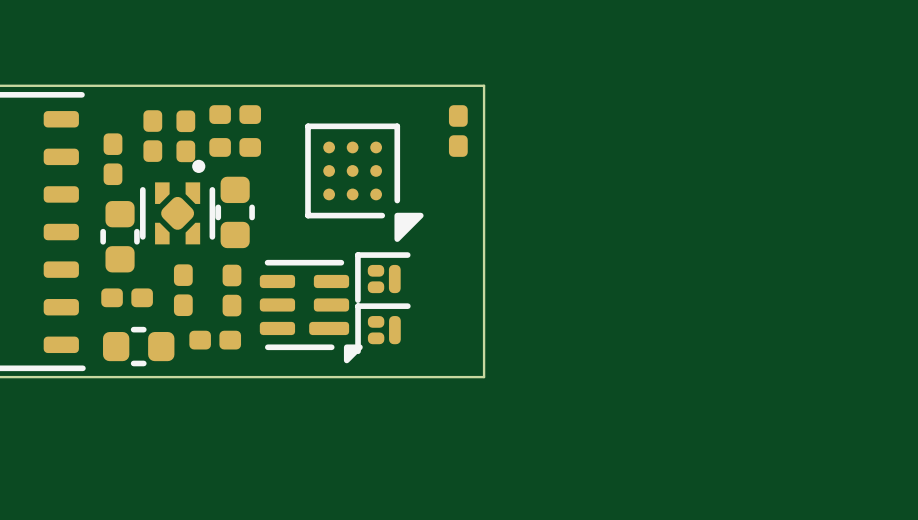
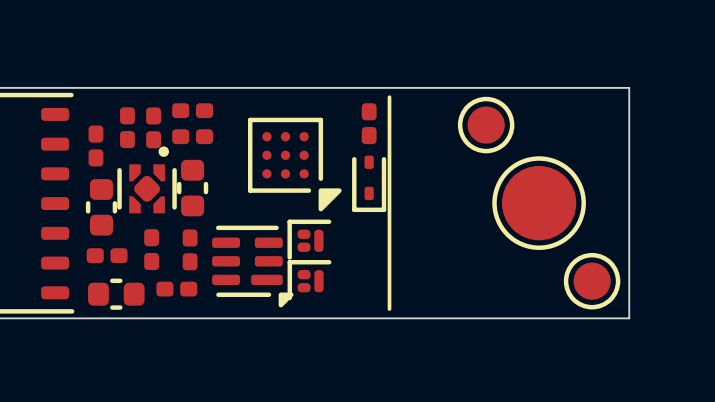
board edge: (484, 85) (484, 377) -> (389, 87) (629, 87) (629, 318) (389, 318)
line: none -> (389, 97) (389, 309)
part: none -> (486, 125)
part: none -> (369, 183)
part: none -> (539, 203)
part: none -> (592, 281)

